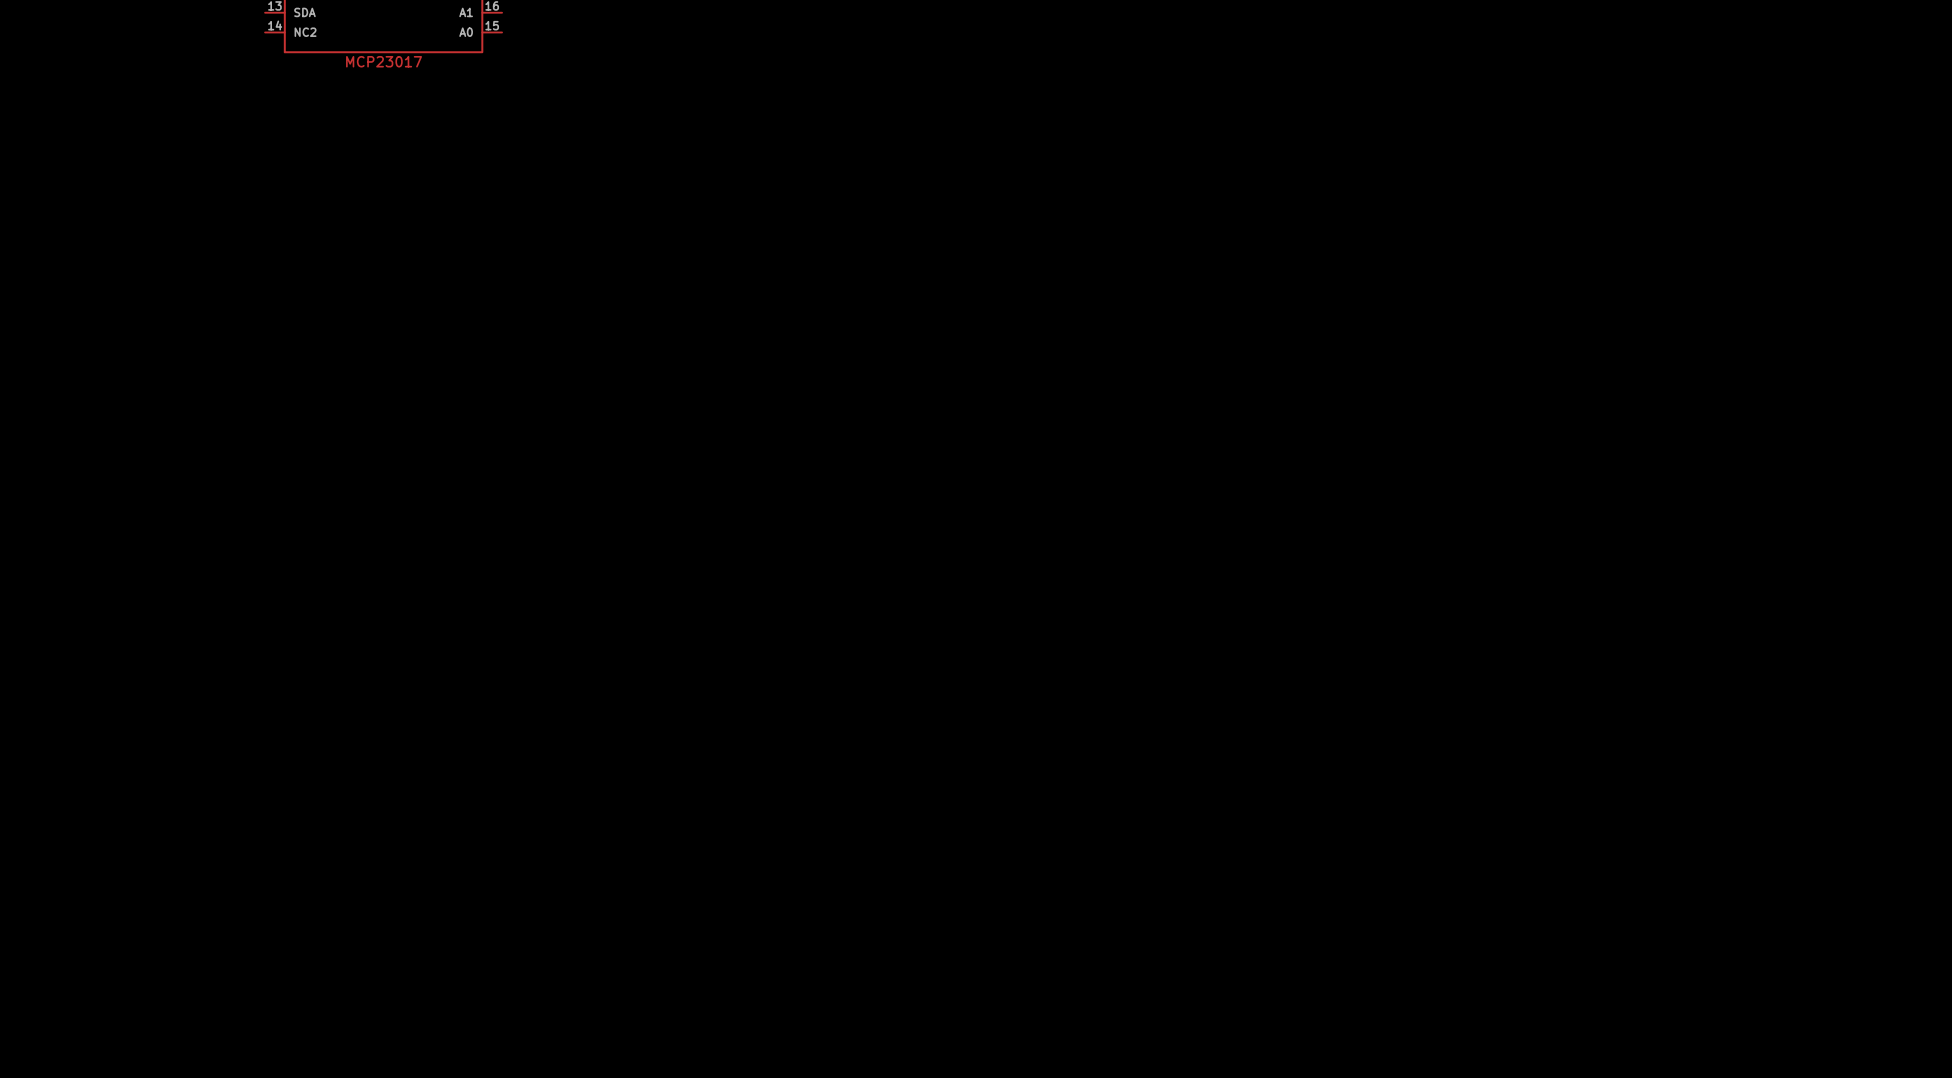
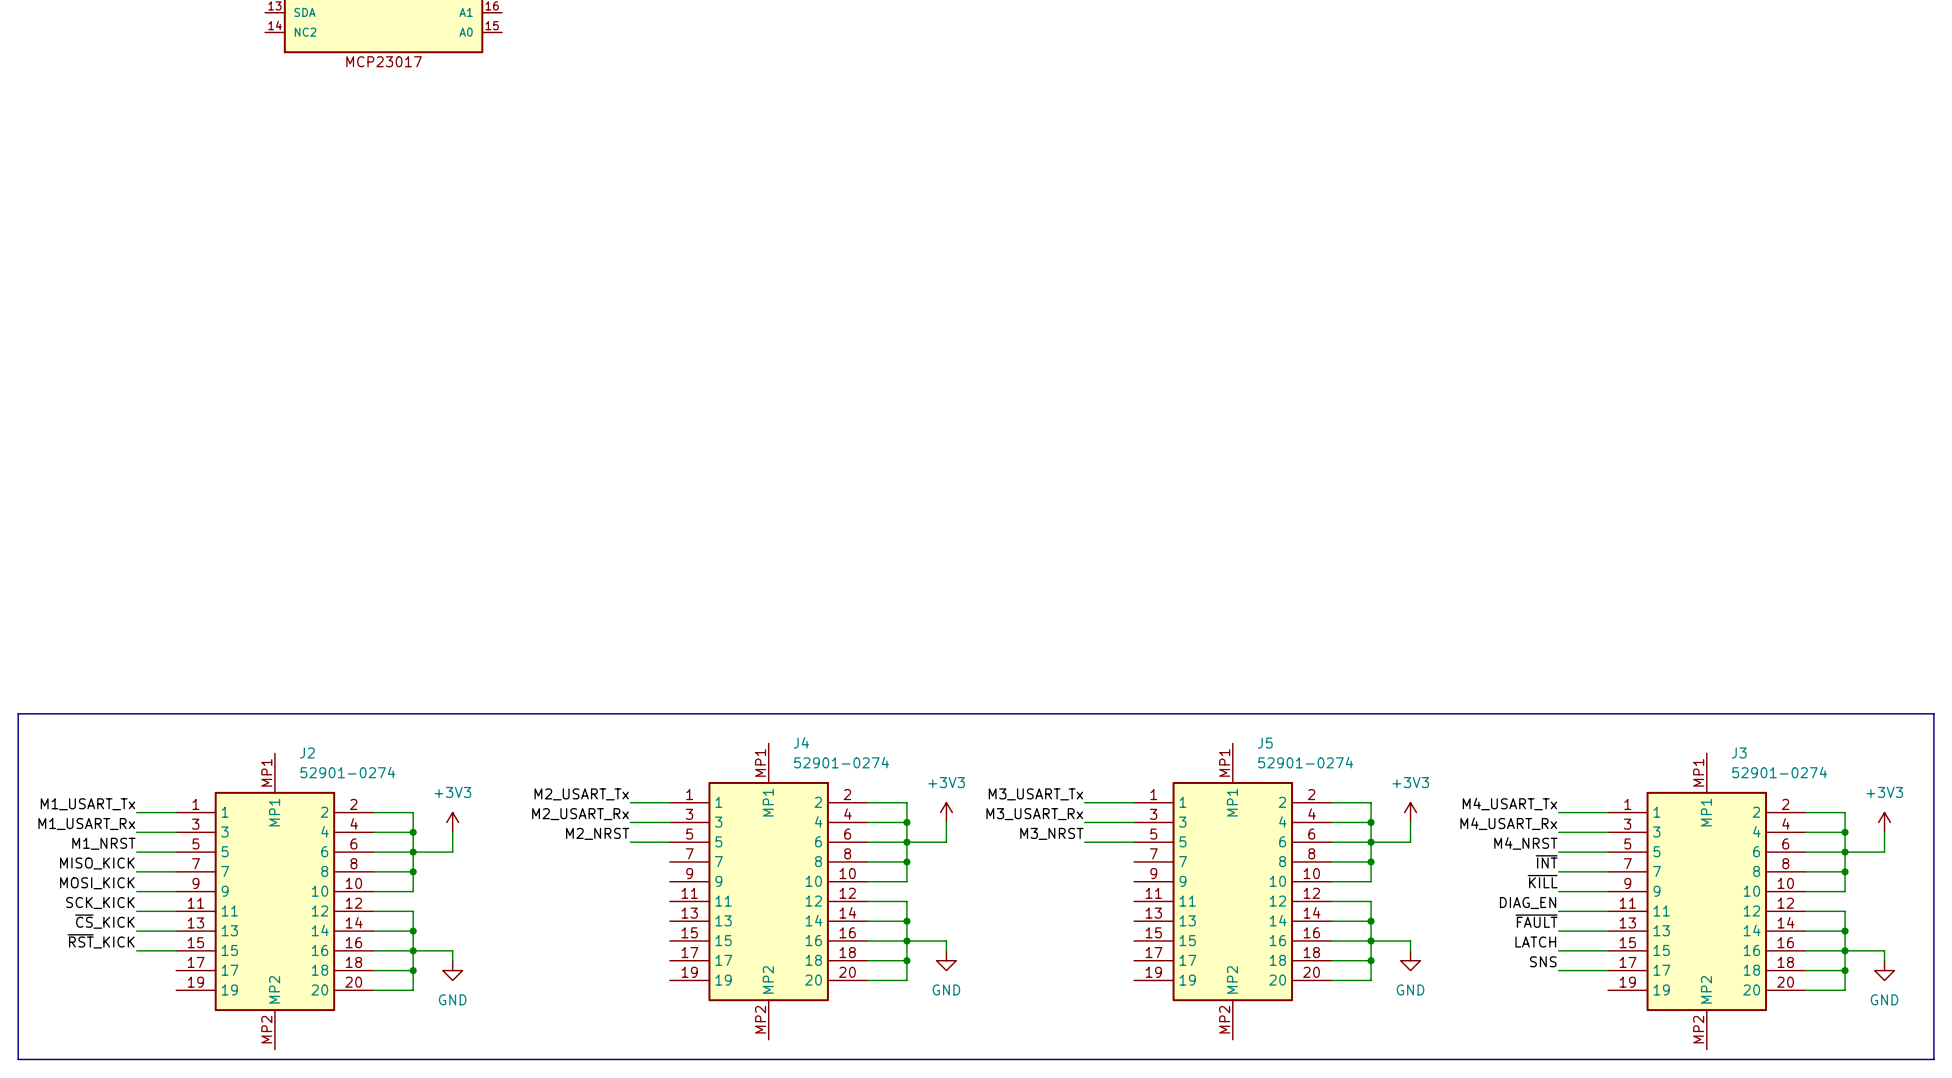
line: none -> (18, 713) (1933, 713) (1933, 1059) (18, 1059) (18, 713)
label: none -> M2_USART_Tx (581, 794)
label: none -> M3_USART_Tx (1035, 794)
wire: none -> (630, 802) (669, 802)
wire: none -> (867, 802) (906, 802) (906, 881) (867, 881)
wire: none -> (1084, 802) (1134, 802)
wire: none -> (1331, 802) (1371, 802) (1371, 881) (1331, 881)
label: none -> M1_USART_Tx (87, 804)
label: none -> M4_USART_Tx (1509, 804)
wire: none -> (136, 812) (176, 812)
wire: none -> (373, 812) (413, 812) (413, 891) (373, 891)
power symbol: none -> +3V3 (946, 812)
power symbol: none -> +3V3 (1410, 812)
wire: none -> (1558, 812) (1608, 812)
wire: none -> (1805, 812) (1845, 812) (1845, 891) (1805, 891)
label: none -> M2_USART_Rx (580, 814)
label: none -> M3_USART_Rx (1034, 814)
power symbol: none -> +3V3 (452, 822)
wire: none -> (630, 822) (669, 822)
wire: none -> (867, 822) (906, 822)
junction: none -> (906, 822)
wire: none -> (946, 822) (946, 842) (867, 842)
wire: none -> (1084, 822) (1134, 822)
wire: none -> (1331, 822) (1371, 822)
junction: none -> (1371, 822)
wire: none -> (1410, 822) (1410, 842) (1331, 842)
power symbol: none -> +3V3 (1884, 822)
label: none -> M4_USART_Rx (1508, 823)
label: none -> M1_USART_Rx (86, 824)
wire: none -> (136, 832) (176, 832)
wire: none -> (373, 832) (413, 832)
junction: none -> (413, 832)
wire: none -> (452, 832) (452, 852) (373, 852)
wire: none -> (1558, 832) (1608, 832)
wire: none -> (1805, 832) (1845, 832)
junction: none -> (1845, 832)
wire: none -> (1884, 832) (1884, 852) (1805, 852)
label: none -> M2_NRST (597, 833)
label: none -> M3_NRST (1051, 833)
wire: none -> (630, 842) (669, 842)
junction: none -> (906, 842)
wire: none -> (1084, 842) (1134, 842)
junction: none -> (1371, 842)
label: none -> M1_NRST (103, 843)
label: none -> M4_NRST (1525, 843)
wire: none -> (136, 852) (176, 852)
junction: none -> (413, 852)
wire: none -> (1558, 852) (1608, 852)
junction: none -> (1845, 852)
wire: none -> (867, 861) (906, 861)
junction: none -> (906, 861)
wire: none -> (1331, 861) (1371, 861)
junction: none -> (1371, 861)
label: none -> ~{INT} (1546, 861)
label: none -> MISO_KICK (97, 863)
wire: none -> (136, 871) (176, 871)
wire: none -> (373, 871) (413, 871)
junction: none -> (413, 871)
wire: none -> (1558, 871) (1608, 871)
wire: none -> (1805, 871) (1845, 871)
junction: none -> (1845, 871)
label: none -> ~{KILL} (1542, 881)
label: none -> MOSI_KICK (97, 883)
wire: none -> (136, 891) (176, 891)
J4: none -> 52901-0274 (768, 891)
J5: none -> 52901-0274 (1232, 891)
wire: none -> (1558, 891) (1608, 891)
J2: none -> 52901-0274 (274, 901)
wire: none -> (867, 901) (906, 901) (906, 980) (867, 980)
wire: none -> (1331, 901) (1371, 901) (1371, 980) (1331, 980)
J3: none -> 52901-0274 (1706, 901)
label: none -> SCK_KICK (100, 903)
label: none -> DIAG_EN (1528, 903)
wire: none -> (136, 911) (176, 911)
wire: none -> (373, 911) (413, 911) (413, 990) (373, 990)
wire: none -> (1558, 911) (1608, 911)
wire: none -> (1805, 911) (1845, 911) (1845, 990) (1805, 990)
label: none -> ~{CS}_KICK (104, 921)
wire: none -> (867, 921) (906, 921)
junction: none -> (906, 921)
wire: none -> (1331, 921) (1371, 921)
junction: none -> (1371, 921)
label: none -> ~{FAULT} (1536, 921)
wire: none -> (136, 931) (176, 931)
wire: none -> (373, 931) (413, 931)
junction: none -> (413, 931)
wire: none -> (1558, 931) (1608, 931)
wire: none -> (1805, 931) (1845, 931)
junction: none -> (1845, 931)
wire: none -> (867, 940) (946, 940) (946, 950)
junction: none -> (906, 940)
wire: none -> (1331, 940) (1410, 940) (1410, 950)
junction: none -> (1371, 940)
label: none -> ~{RST}_KICK (101, 941)
label: none -> LATCH (1535, 942)
wire: none -> (136, 950) (176, 950)
wire: none -> (373, 950) (452, 950) (452, 960)
junction: none -> (413, 950)
wire: none -> (1558, 950) (1608, 950)
wire: none -> (1805, 950) (1884, 950) (1884, 960)
junction: none -> (1845, 950)
wire: none -> (867, 960) (906, 960)
junction: none -> (906, 960)
power symbol: none -> GND (946, 960)
wire: none -> (1331, 960) (1371, 960)
junction: none -> (1371, 960)
power symbol: none -> GND (1410, 960)
label: none -> SNS (1543, 961)
wire: none -> (373, 970) (413, 970)
junction: none -> (413, 970)
power symbol: none -> GND (452, 970)
wire: none -> (1558, 970) (1608, 970)
wire: none -> (1805, 970) (1845, 970)
junction: none -> (1845, 970)
power symbol: none -> GND (1884, 970)

